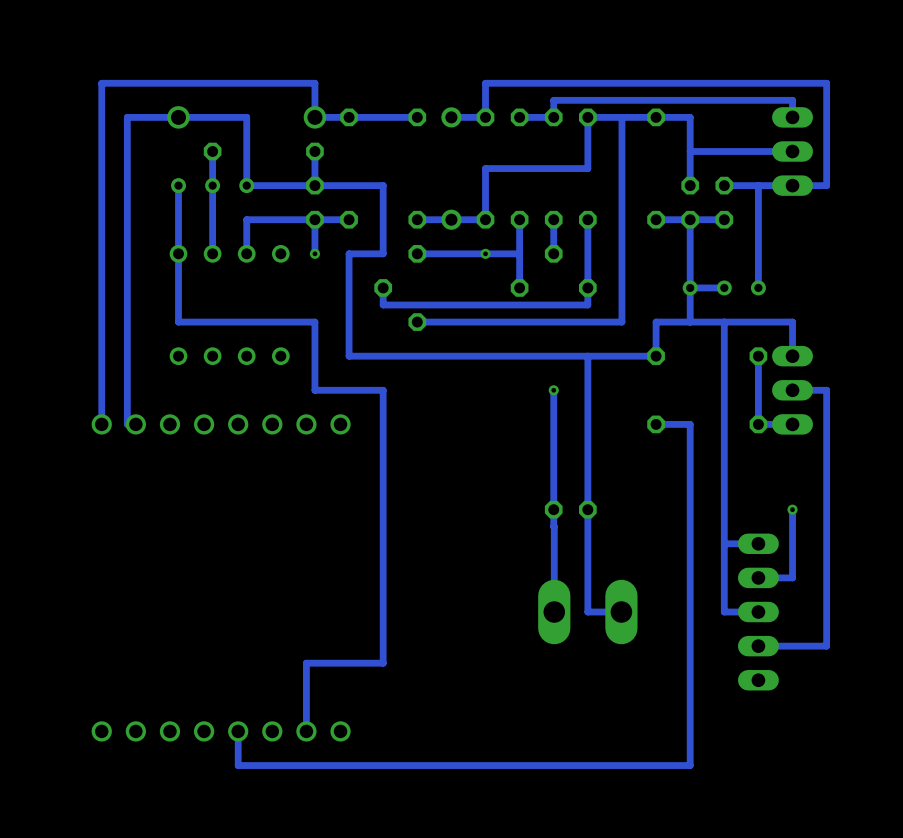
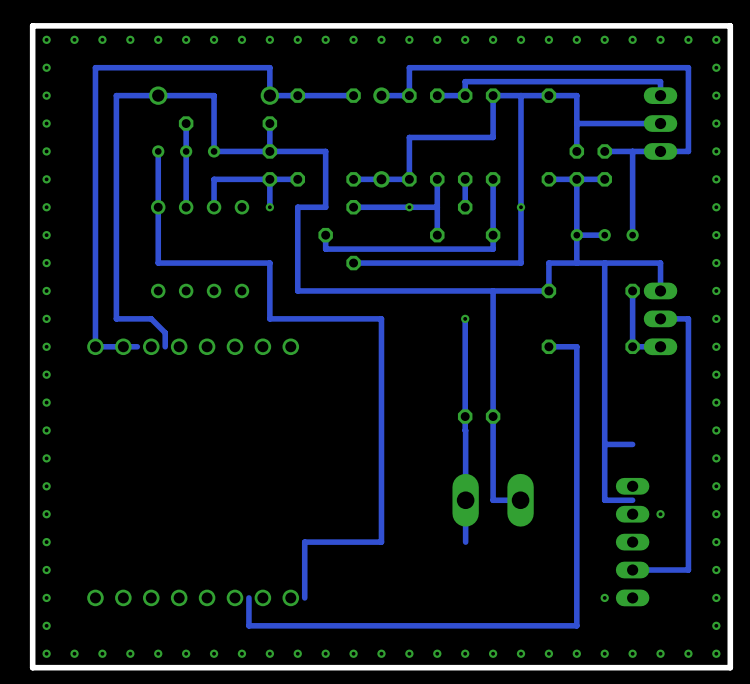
board edge: none -> (730, 25) (32, 25) (32, 667) (730, 667) (730, 25)
via: none -> (46, 39)
via: none -> (74, 39)
via: none -> (102, 39)
via: none -> (130, 39)
via: none -> (158, 39)
via: none -> (186, 39)
via: none -> (214, 39)
via: none -> (241, 39)
via: none -> (269, 39)
via: none -> (297, 39)
via: none -> (325, 39)
via: none -> (353, 39)
via: none -> (381, 39)
via: none -> (409, 39)
via: none -> (437, 39)
via: none -> (465, 39)
via: none -> (493, 39)
via: none -> (521, 39)
via: none -> (548, 39)
via: none -> (576, 39)
via: none -> (604, 39)
via: none -> (632, 39)
via: none -> (660, 39)
via: none -> (688, 39)
via: none -> (716, 39)
via: none -> (46, 67)
via: none -> (716, 67)
via: none -> (46, 95)
via: none -> (716, 95)
via: none -> (46, 123)
via: none -> (716, 123)
via: none -> (46, 151)
via: none -> (716, 151)
via: none -> (46, 179)
via: none -> (716, 179)
via: none -> (46, 207)
via: none -> (521, 207)
via: none -> (716, 207)
via: none -> (46, 235)
via: none -> (716, 235)
via: none -> (46, 263)
via: none -> (716, 263)
via: none -> (46, 290)
via: none -> (716, 290)
via: none -> (46, 318)
track: (127, 390) (127, 424) -> (95, 346) (116, 346)
track: none -> (116, 318) (151, 318) (165, 332) (165, 346)
track: (383, 390) (383, 663) -> (325, 318) (381, 318) (381, 542) (325, 542)
via: none -> (716, 318)
via: none -> (46, 346)
track: none -> (137, 346) (123, 346)
via: none -> (716, 346)
via: none -> (46, 374)
via: none -> (716, 374)
via: none -> (46, 402)
via: none -> (716, 402)
track: (792, 509) (792, 577) (758, 577) -> none
via: (792, 509) -> none
via: none -> (46, 430)
via: none -> (716, 430)
via: none -> (46, 458)
via: none -> (716, 458)
via: none -> (46, 486)
via: none -> (716, 486)
track: none -> (465, 500) (465, 542)
part position: (758, 612) -> (632, 542)
via: none -> (46, 514)
via: none -> (660, 514)
via: none -> (716, 514)
track: (826, 646) (758, 646) -> (688, 528) (688, 570) (632, 570)
via: none -> (46, 542)
track: (357, 663) (306, 663) (306, 731) -> (304, 542) (304, 597)
via: none -> (716, 542)
via: none -> (46, 570)
via: none -> (716, 570)
via: none -> (46, 597)
track: (238, 731) (238, 765) (289, 765) -> (248, 597) (248, 625)
via: none -> (604, 597)
via: none -> (716, 597)
via: none -> (46, 625)
via: none -> (716, 625)
via: none -> (46, 653)
via: none -> (74, 653)
via: none -> (102, 653)
via: none -> (130, 653)
via: none -> (158, 653)
via: none -> (186, 653)
via: none -> (214, 653)
via: none -> (241, 653)
via: none -> (269, 653)
via: none -> (297, 653)
via: none -> (325, 653)
via: none -> (353, 653)
via: none -> (381, 653)
via: none -> (409, 653)
via: none -> (437, 653)
via: none -> (465, 653)
via: none -> (493, 653)
via: none -> (521, 653)
via: none -> (548, 653)
via: none -> (576, 653)
via: none -> (604, 653)
via: none -> (632, 653)
via: none -> (660, 653)
via: none -> (688, 653)
via: none -> (716, 653)

